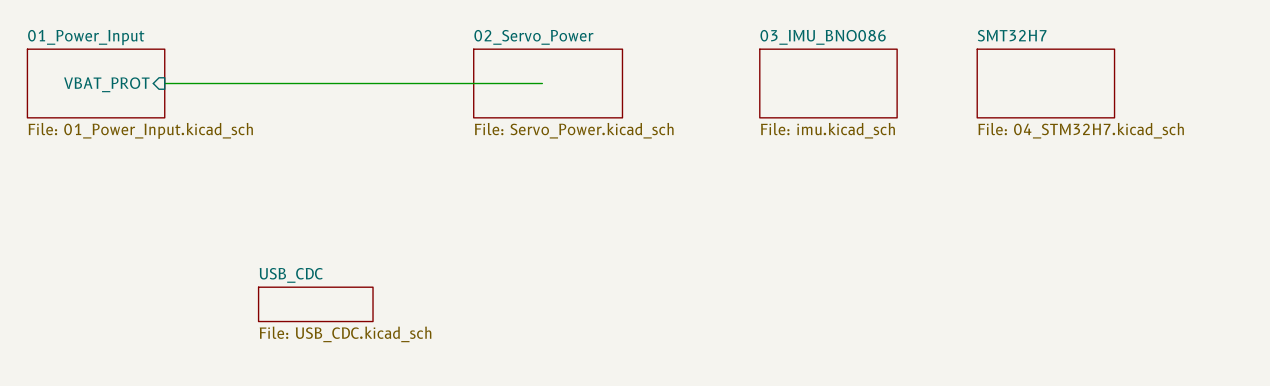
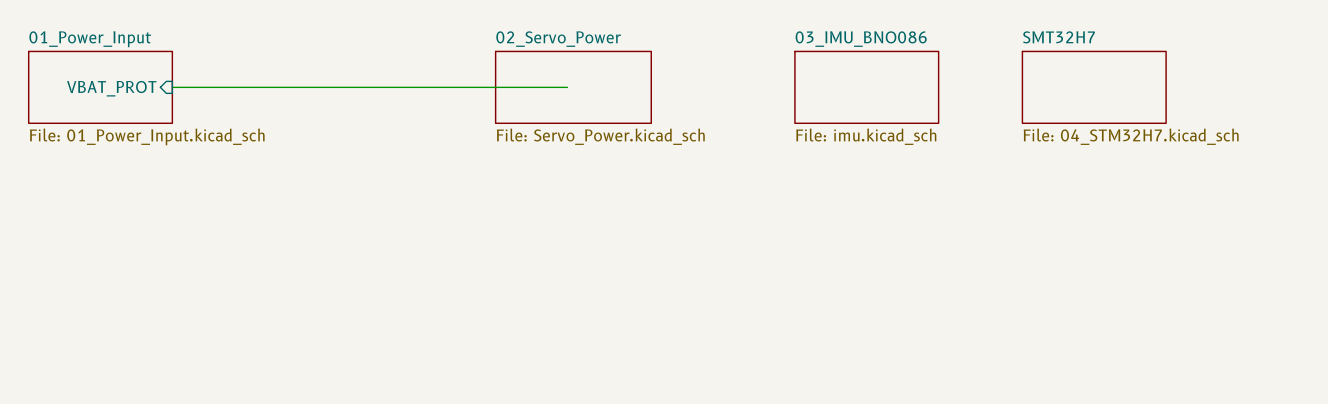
sheet USB_CDC: File: USB_CDC.kicad_sch (315, 304) -> none

